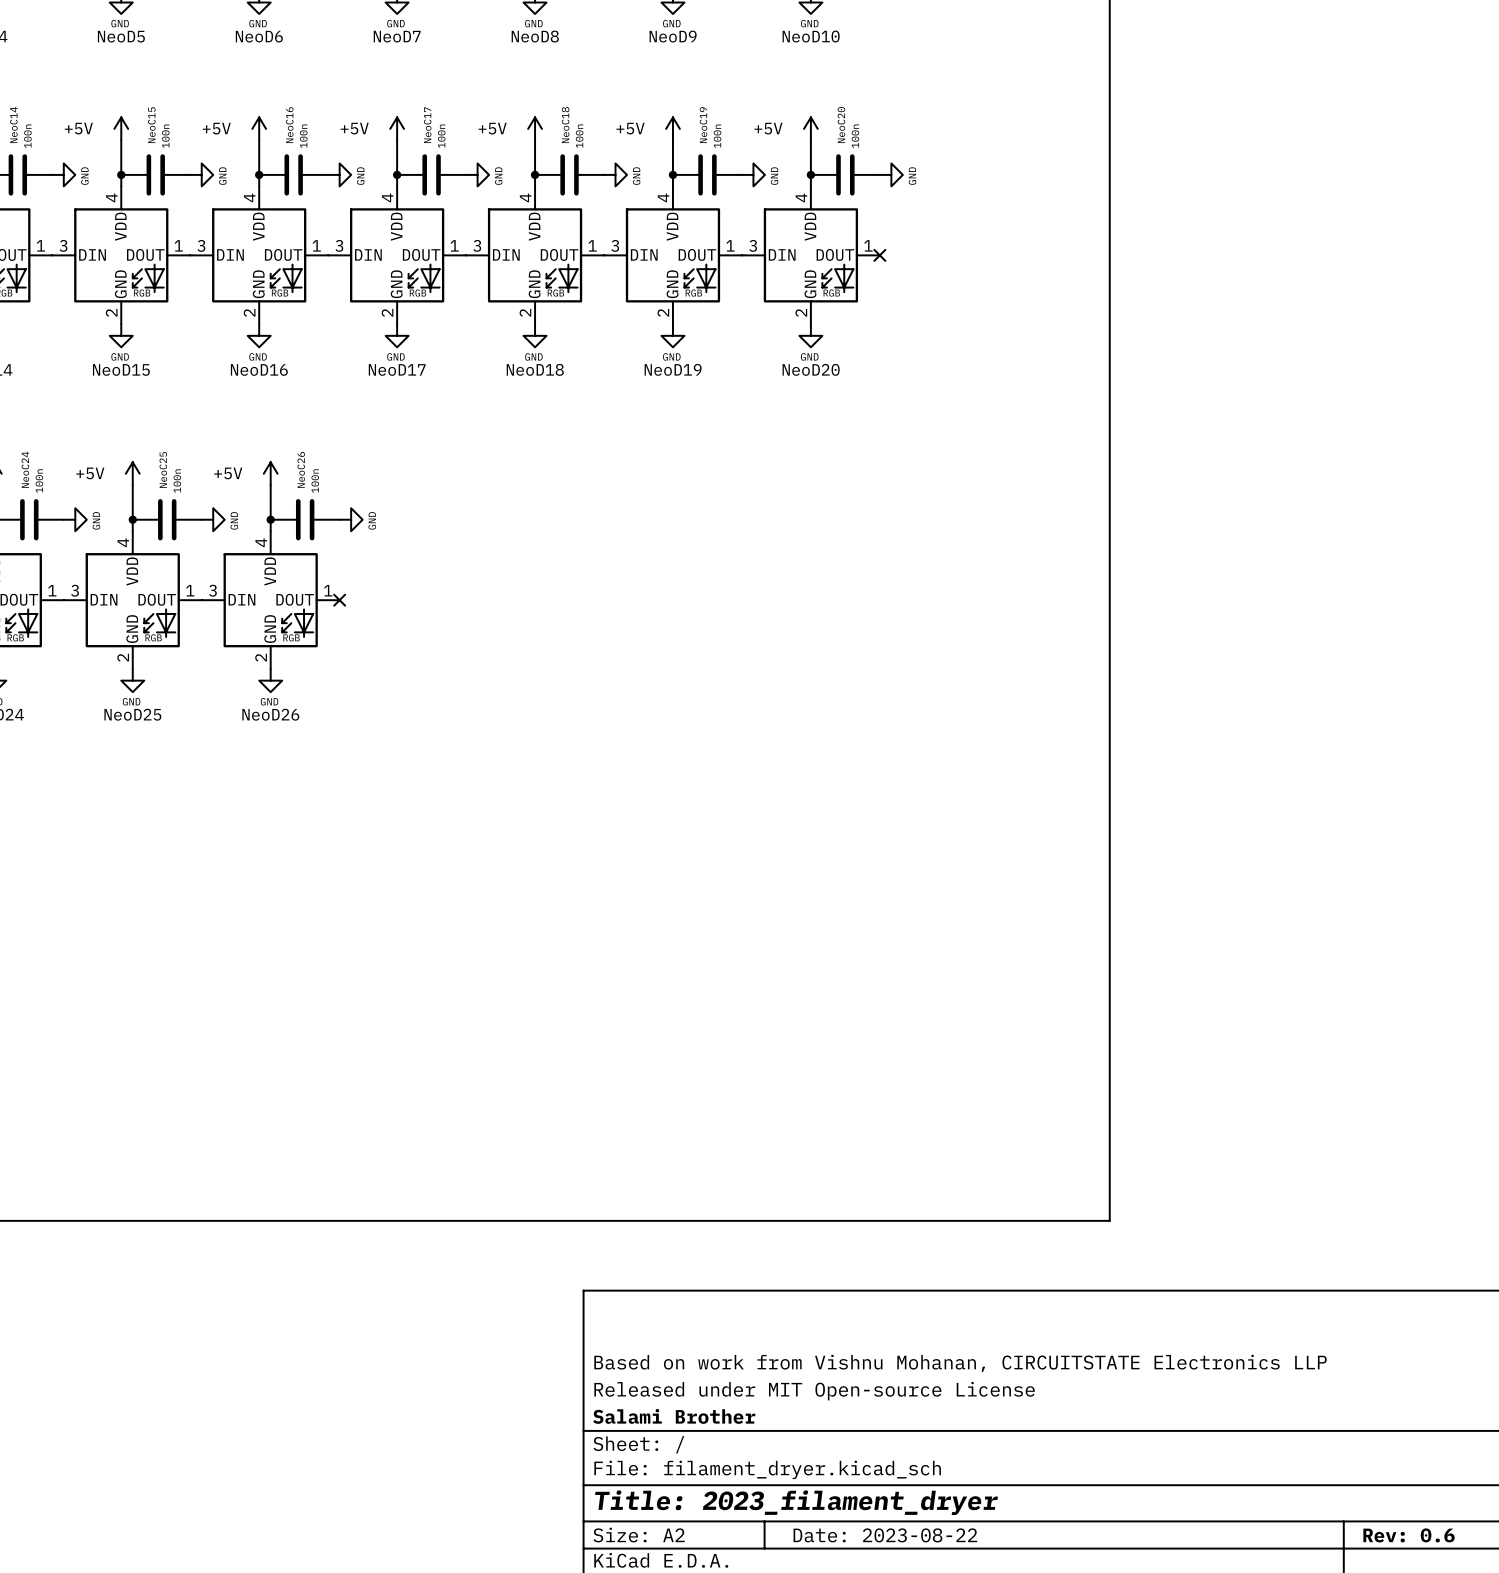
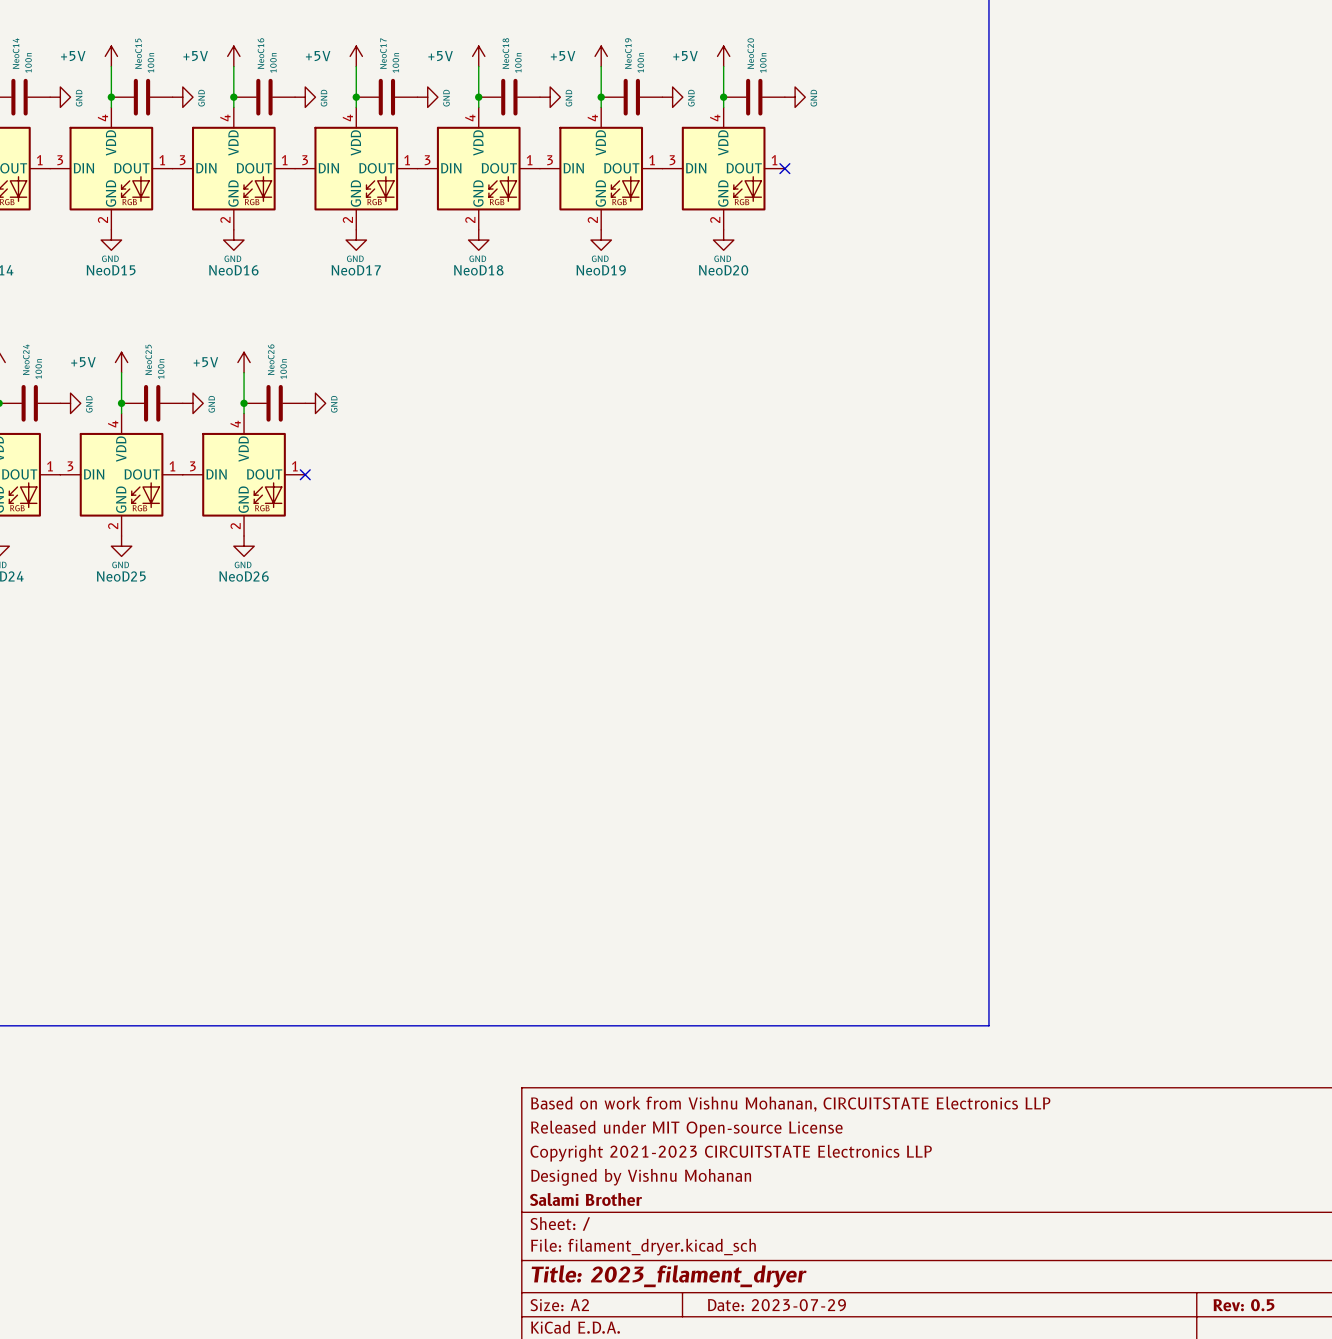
title block: none -> Based on work from Vishnu Mohanan, CIRCUITSTATE Electronics LLP (790, 1104)
title block: none -> Released under MIT Open-source License (686, 1129)
title block: Based on work from Vishnu Mohanan, CIRCUITSTATE Electronics LLP (960, 1363) -> Copyright 2021-2023 CIRCUITSTATE Electronics LLP (731, 1153)
title block: Released under MIT Open-source License (814, 1391) -> Designed by Vishnu Mohanan (641, 1177)
title block: Date: 2023-08-22 (885, 1535) -> Date: 2023-07-29 (776, 1305)
title block: Rev: 0.6 (1409, 1535) -> Rev: 0.5 (1243, 1305)

